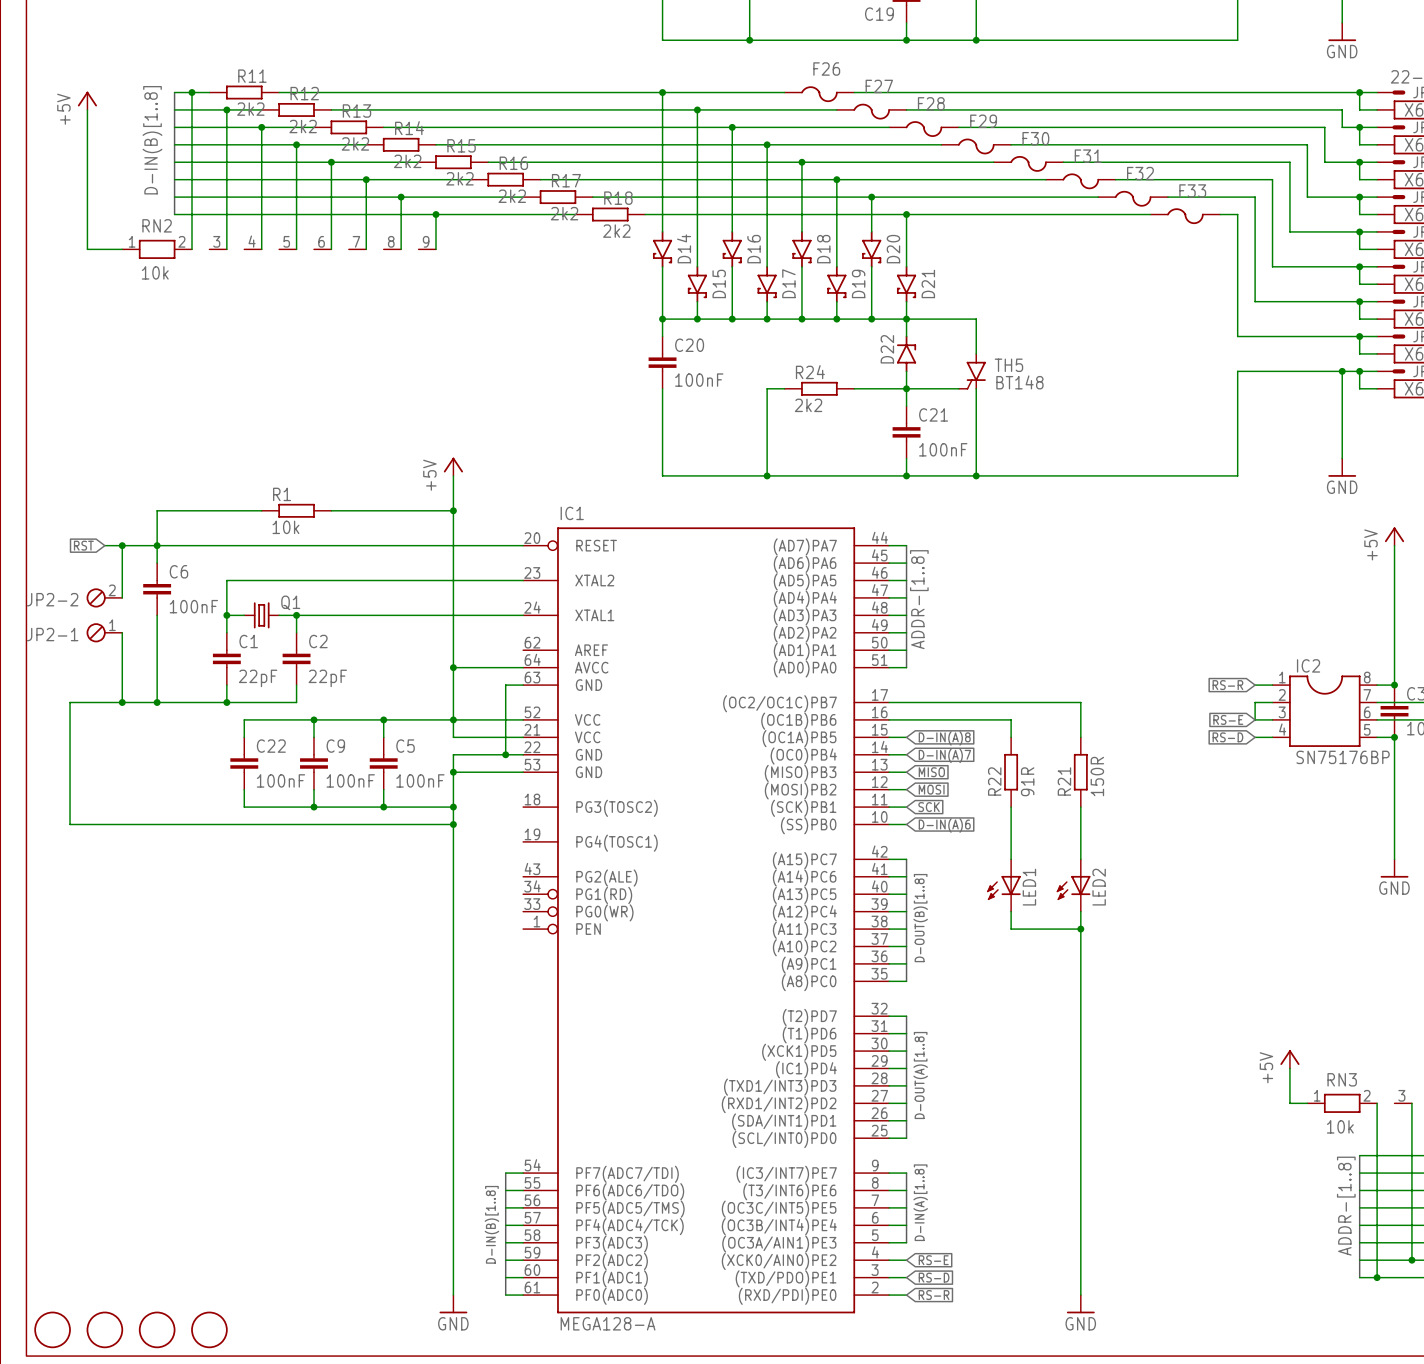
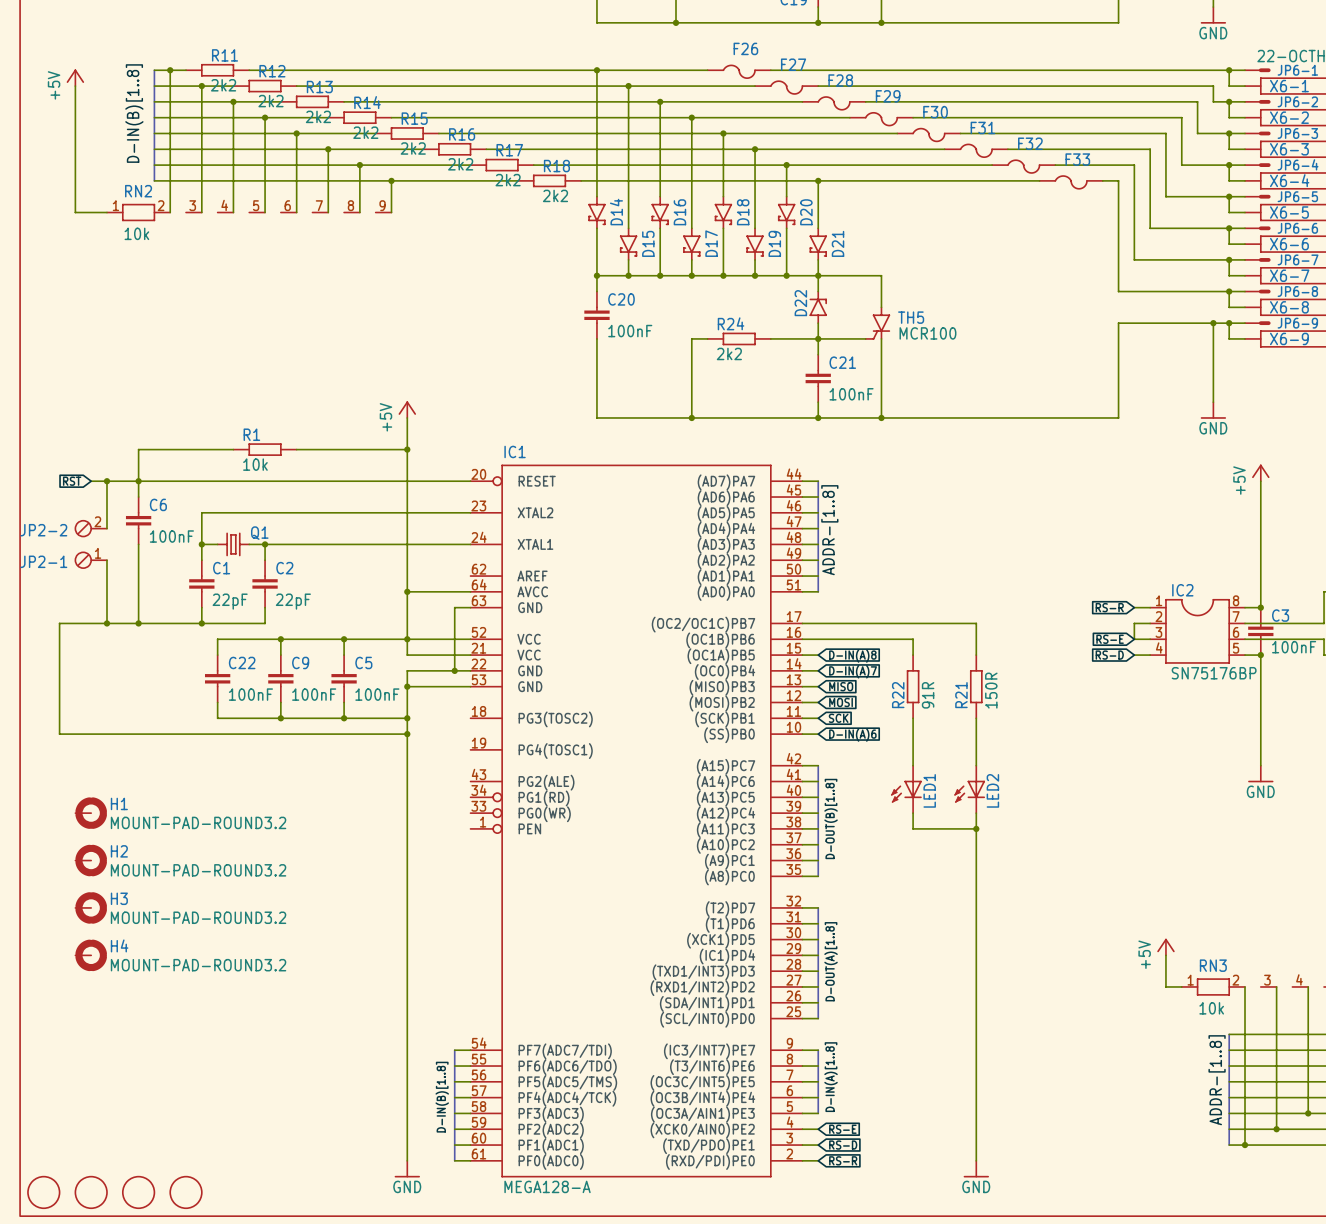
TH5 value: BT148 (1019, 382) -> MCR100 (927, 333)
H1: none -> MOUNT-PAD-ROUND3.2 (91, 813)
H2: none -> MOUNT-PAD-ROUND3.2 (91, 860)
H3: none -> MOUNT-PAD-ROUND3.2 (91, 907)
H4: none -> MOUNT-PAD-ROUND3.2 (91, 955)

